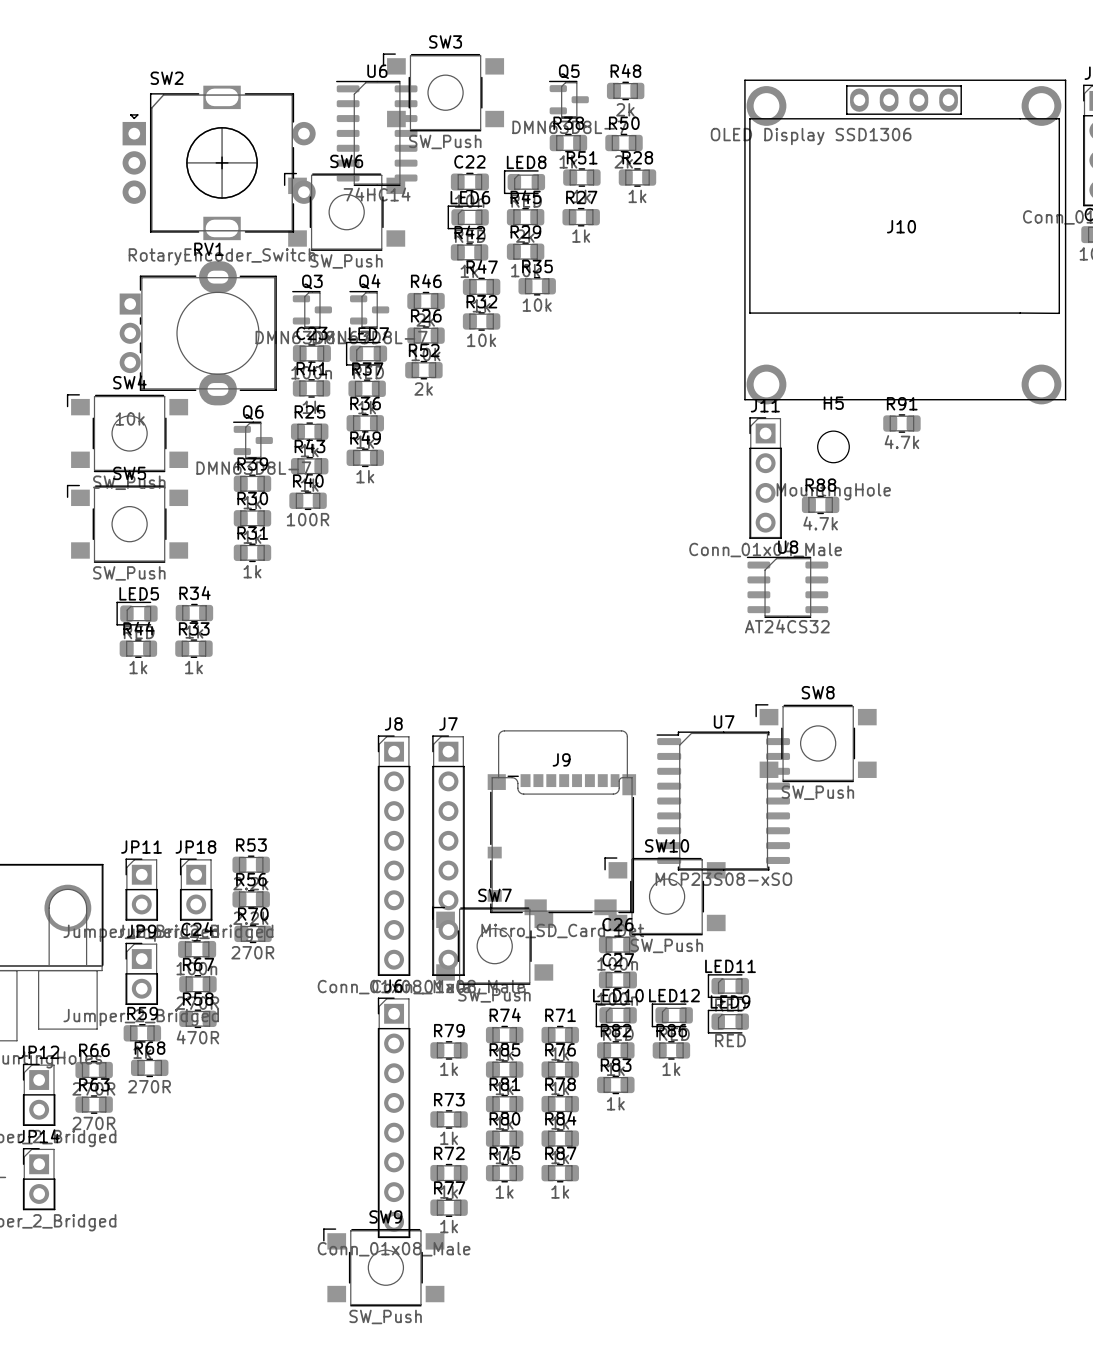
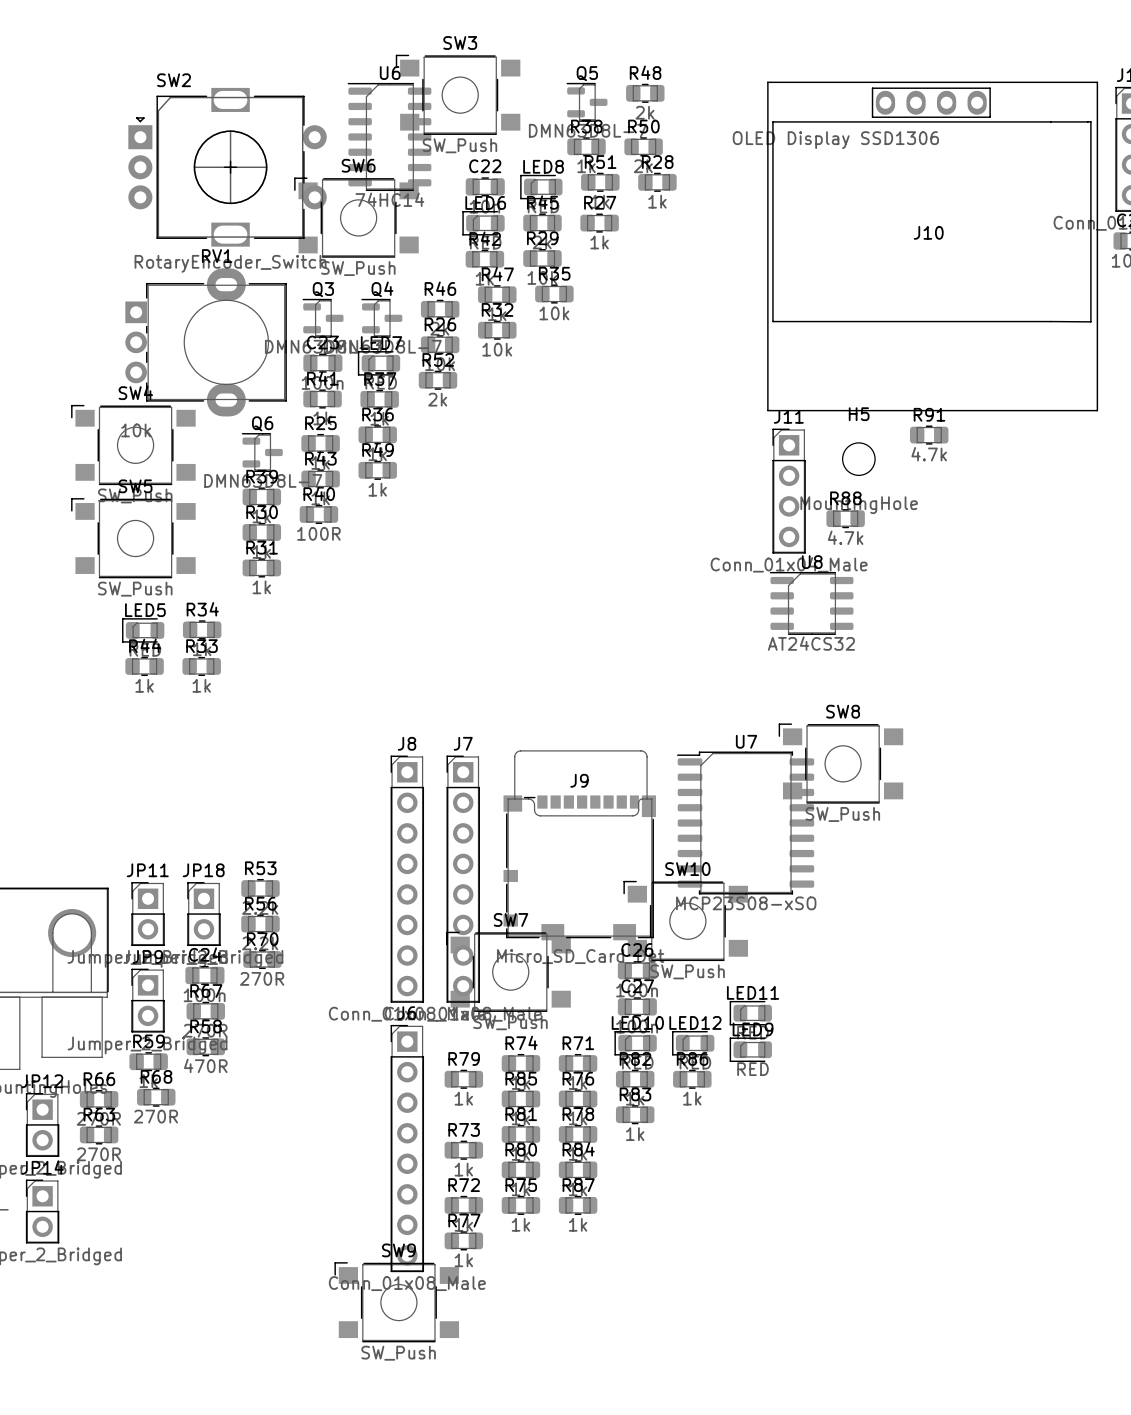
J10 footprint: [744, 79, 1067, 405] -> [767, 81, 1099, 412]

